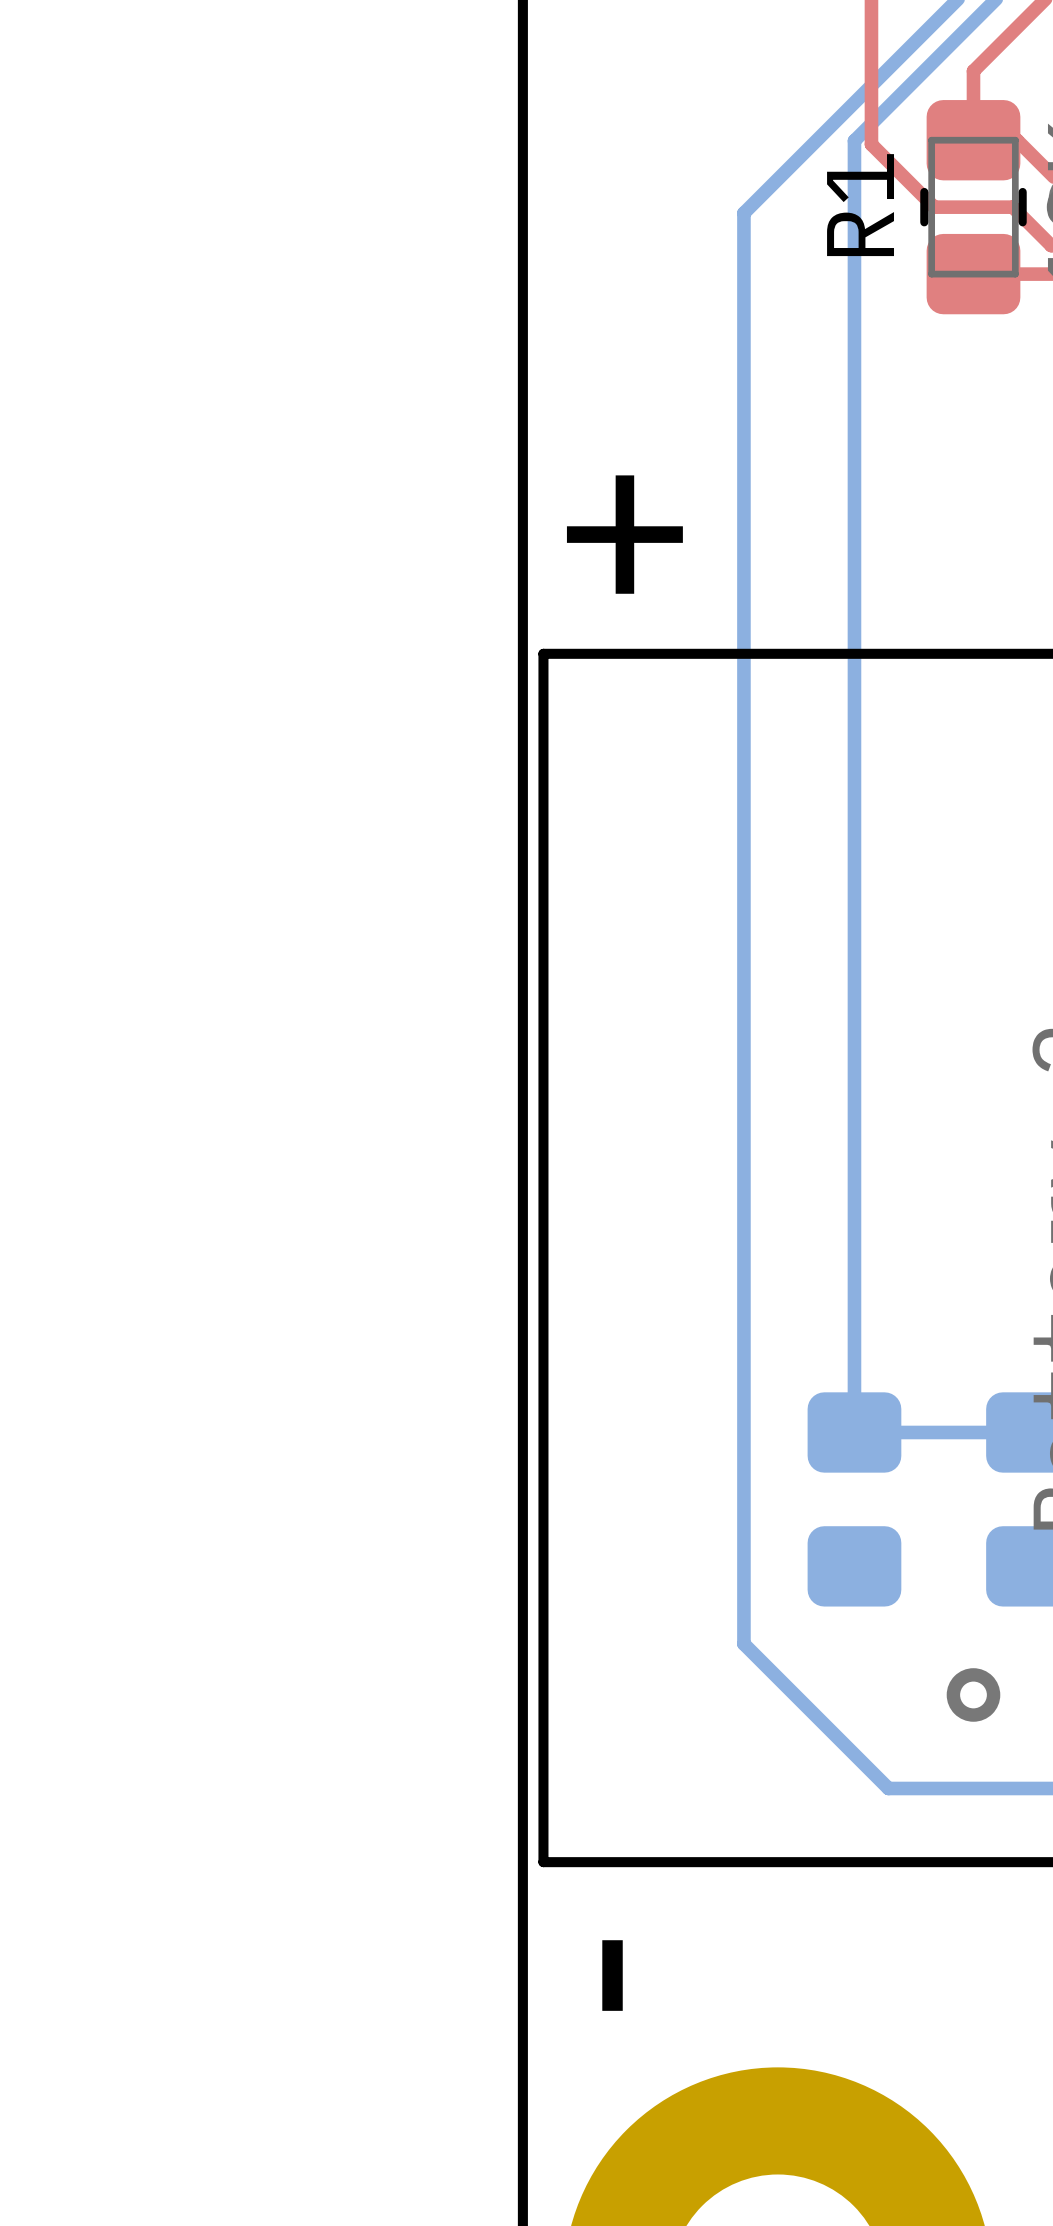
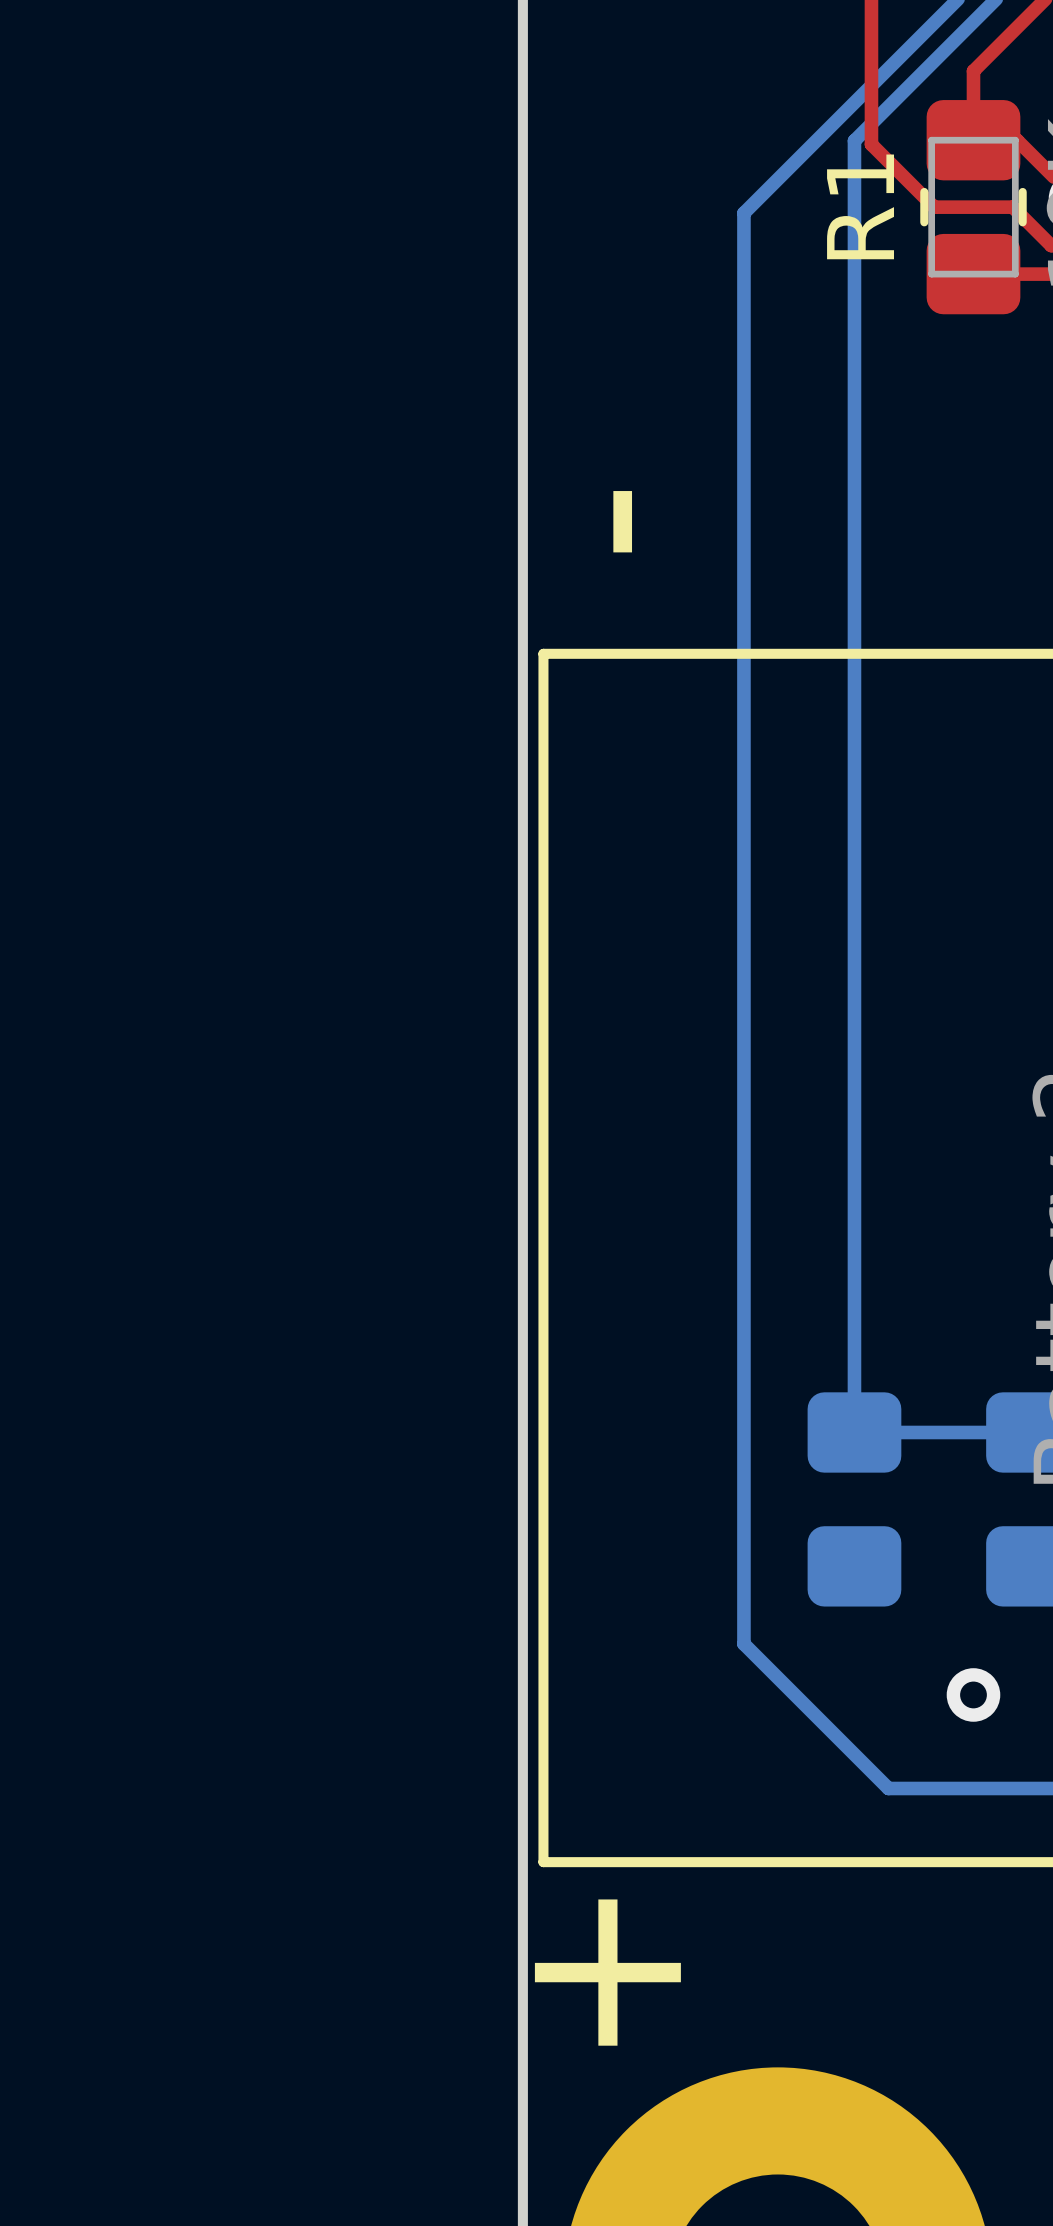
text position: + (624, 534) -> + (607, 1972)
text position: - (612, 1975) -> - (622, 521)

